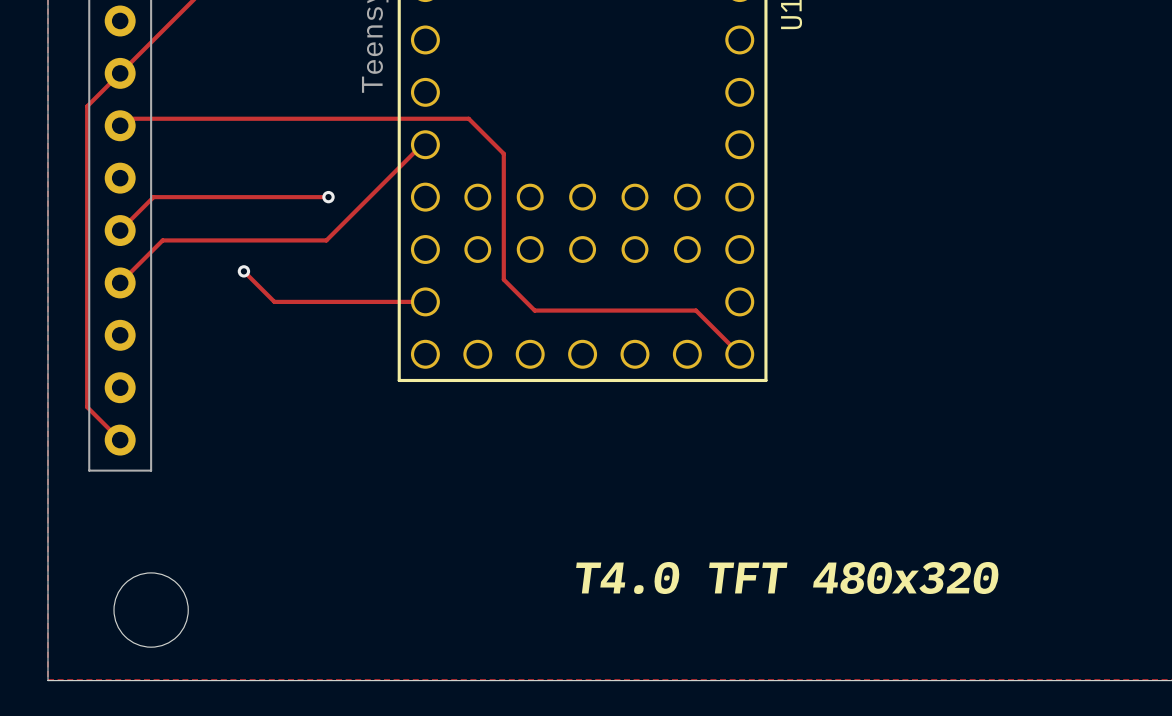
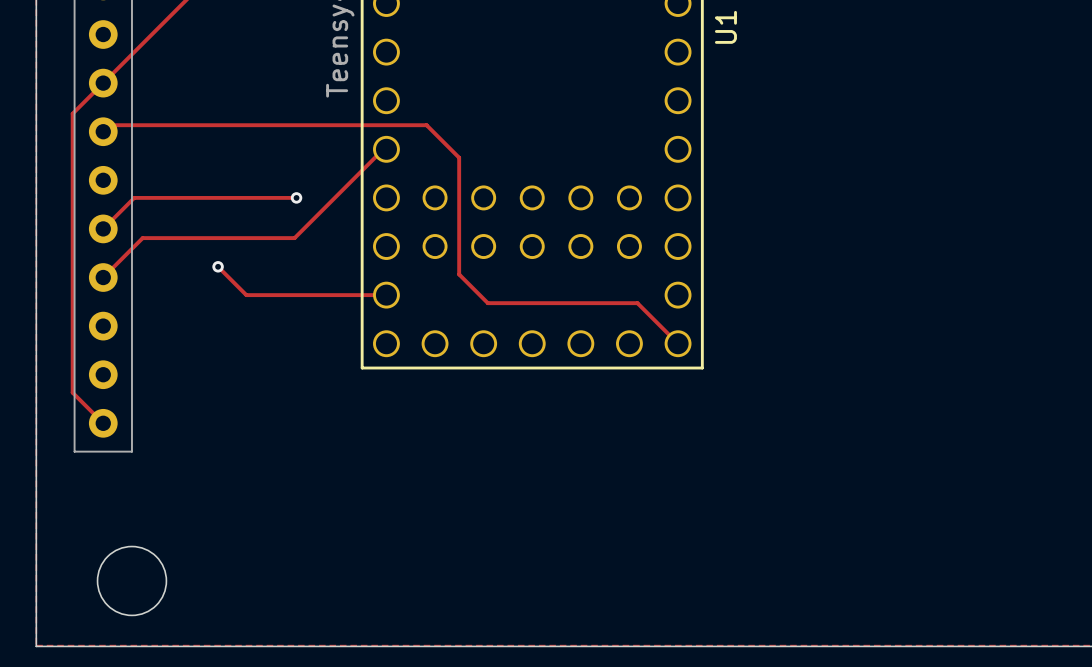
text: T4.0 TFT 480x320 (787, 577) -> none

